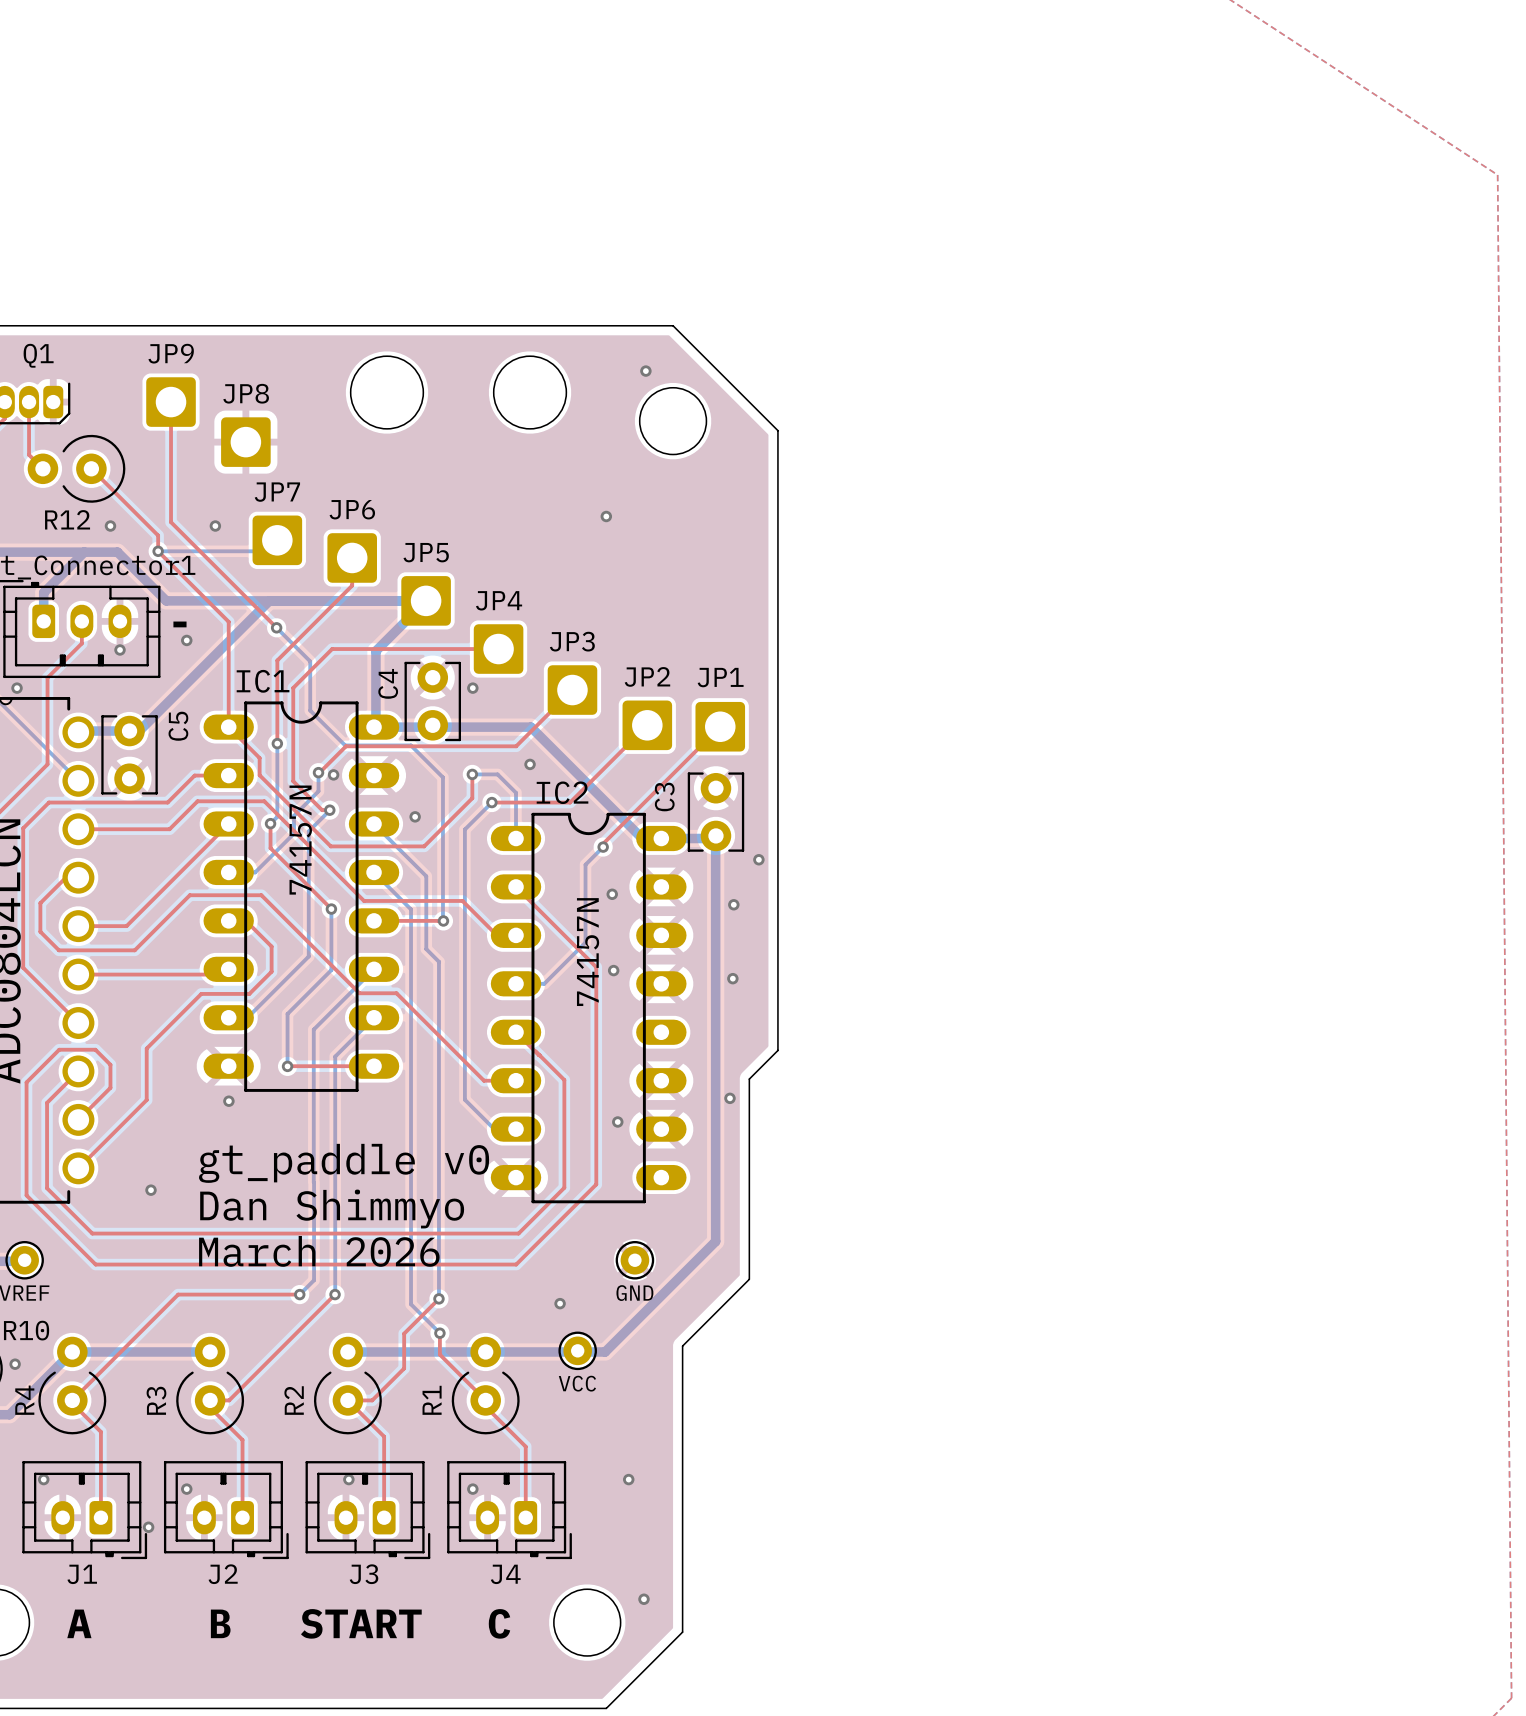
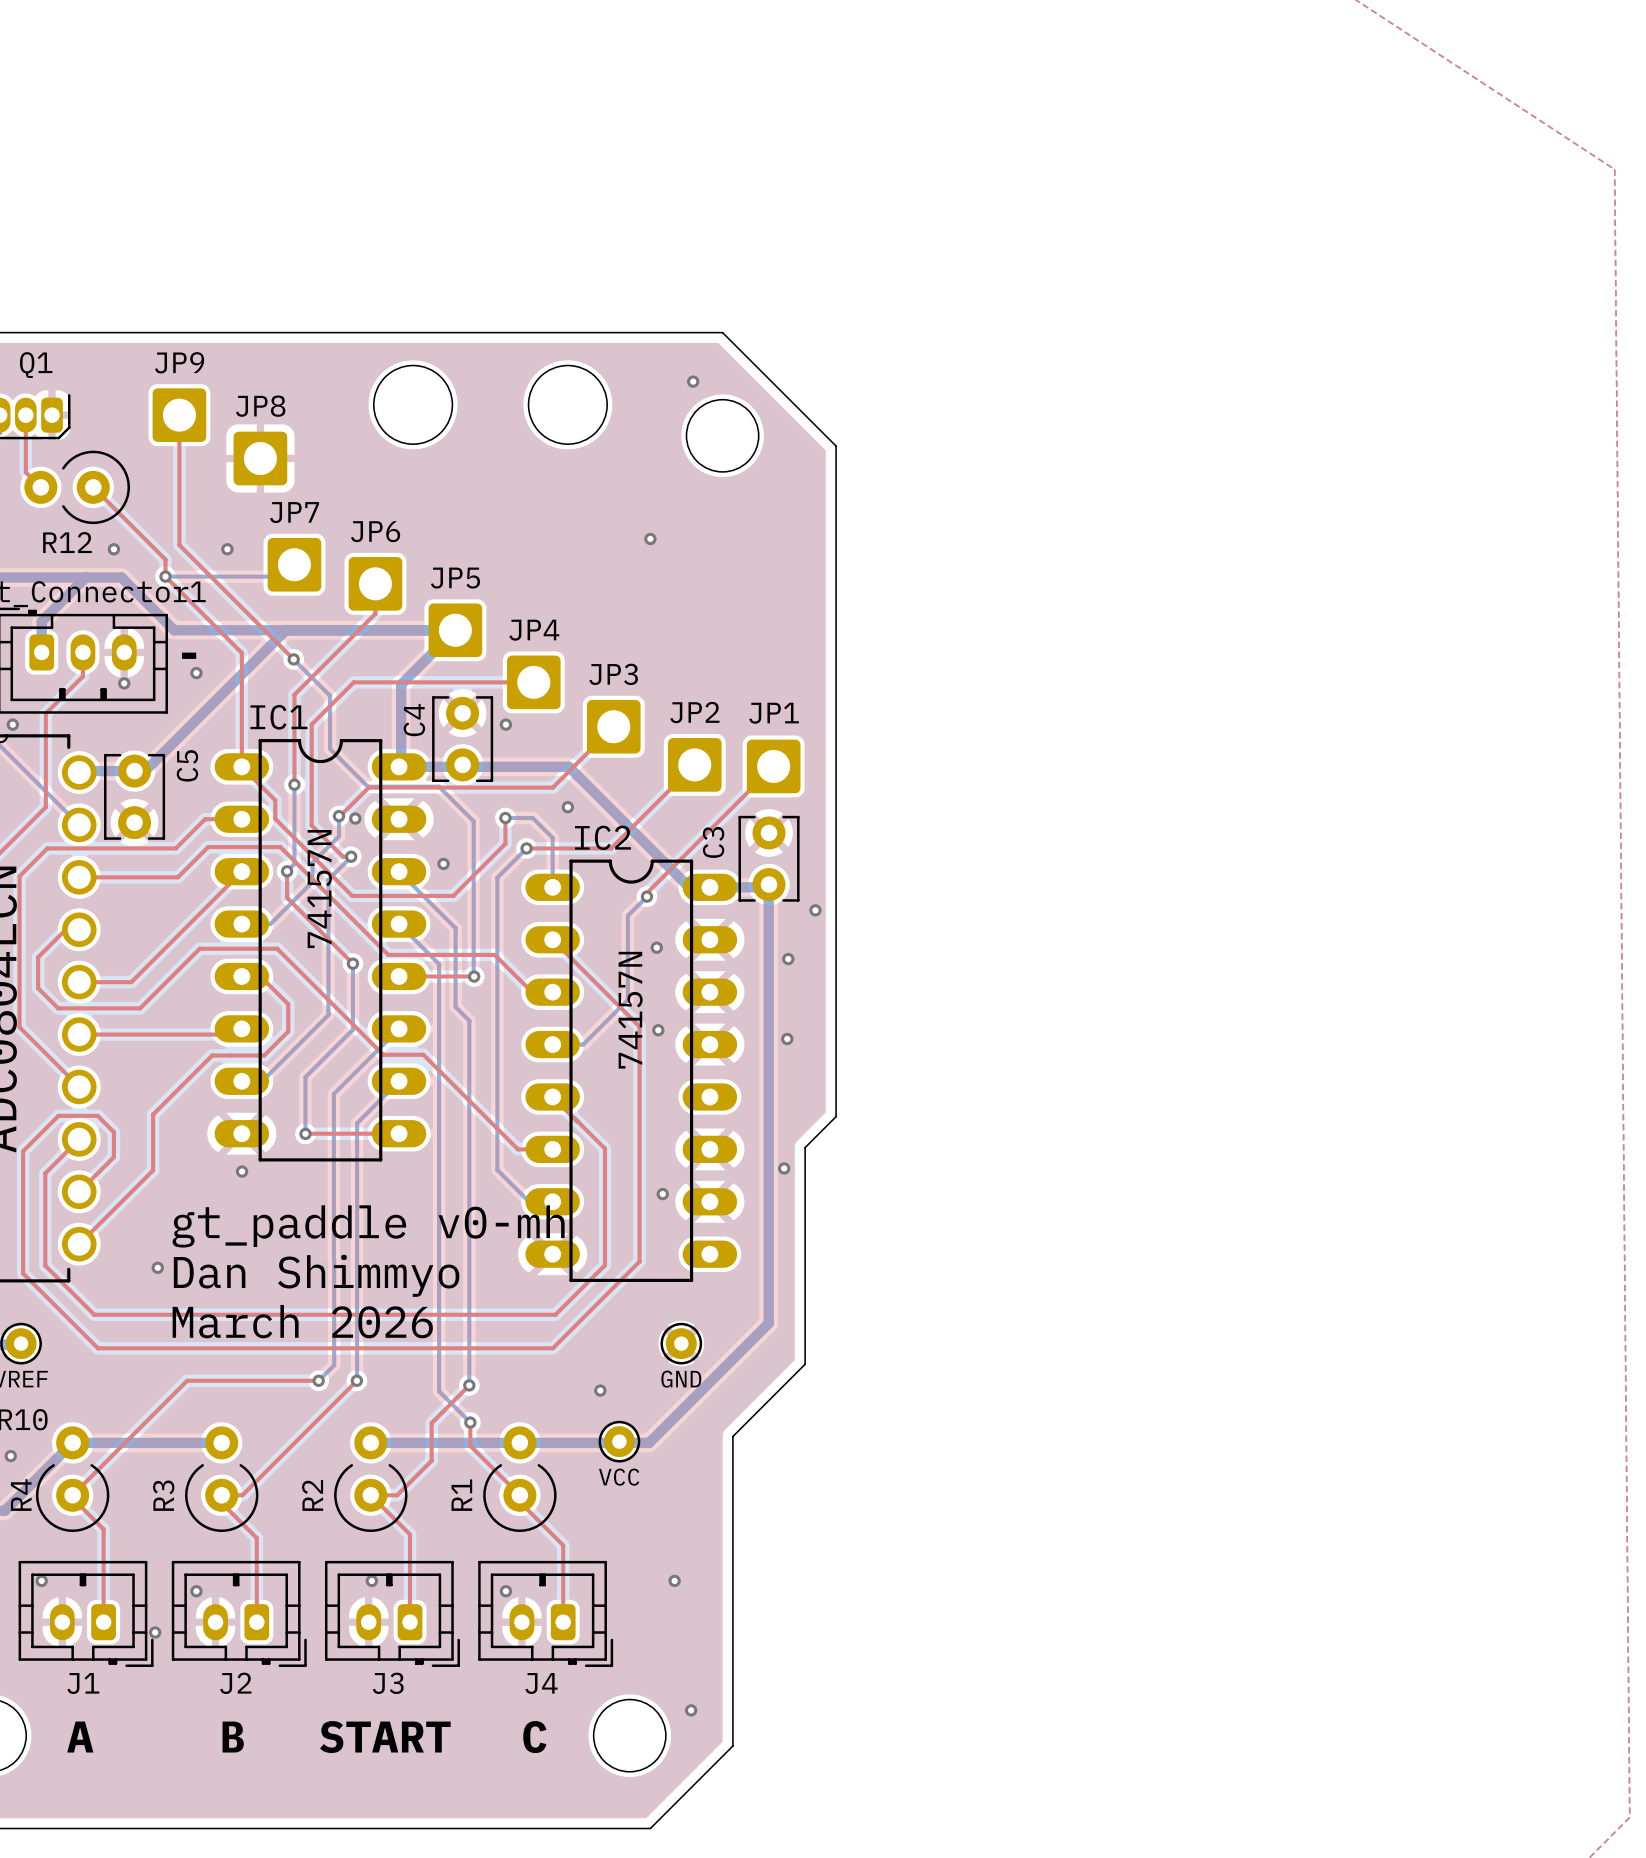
text: gt_paddle v0 (344, 1163) -> gt_paddle v0-mh (368, 1226)
text position: Dan Shimmyo (332, 1209) -> Dan Shimmyo (316, 1275)
text position: March 2026 (319, 1251) -> March 2026 (302, 1321)

